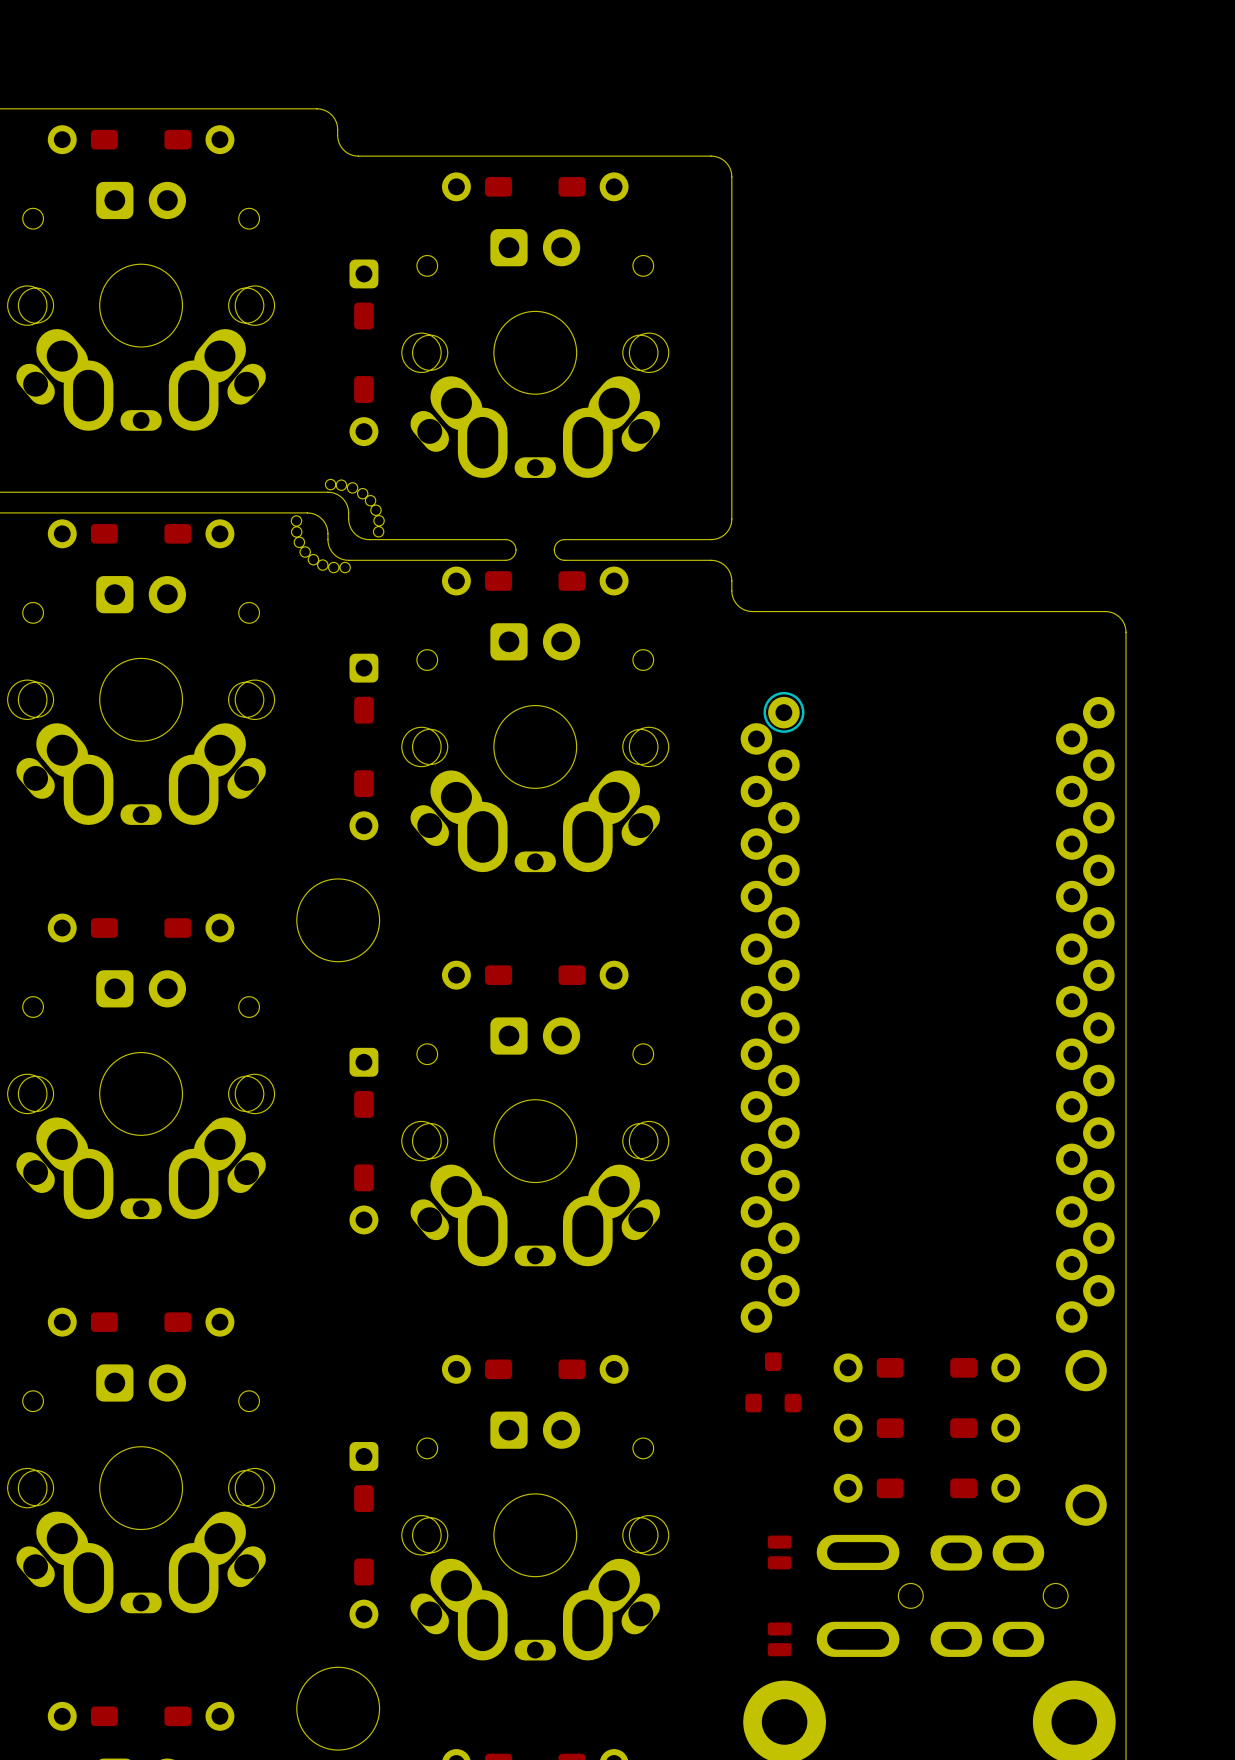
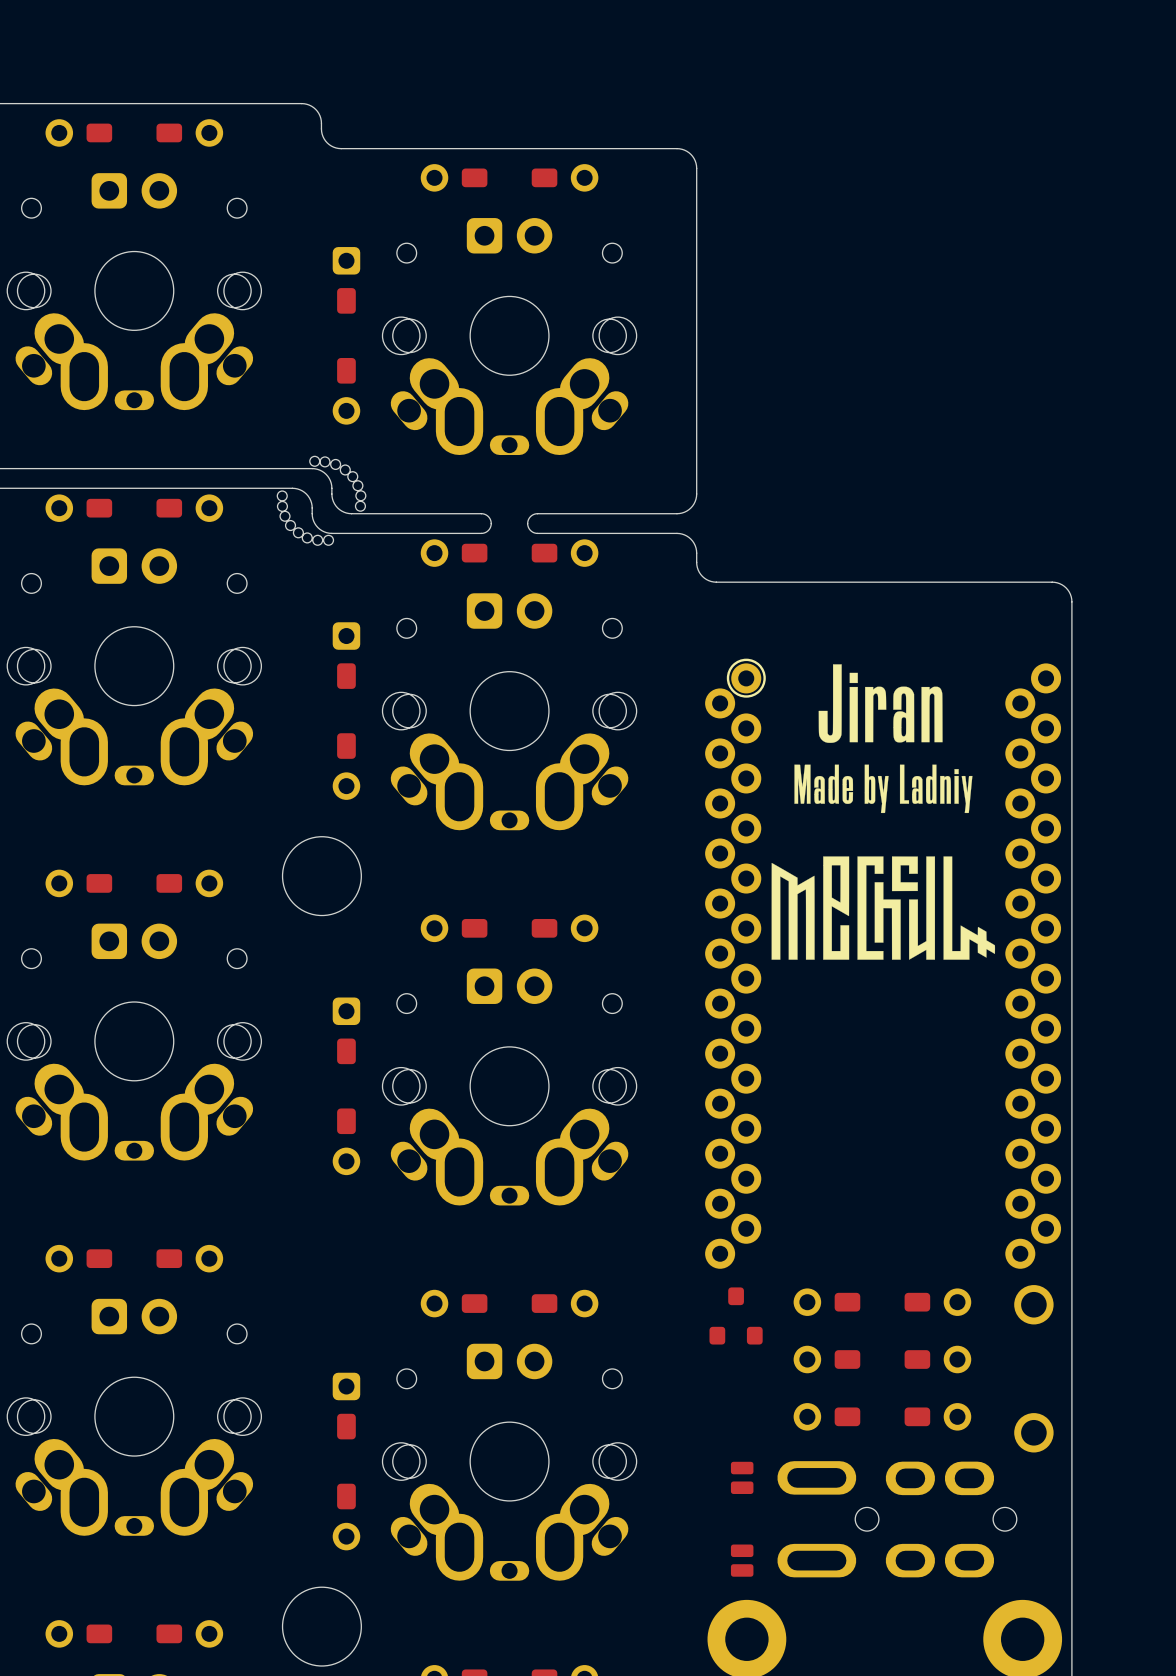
drawing: none -> [771, 664, 996, 960]

